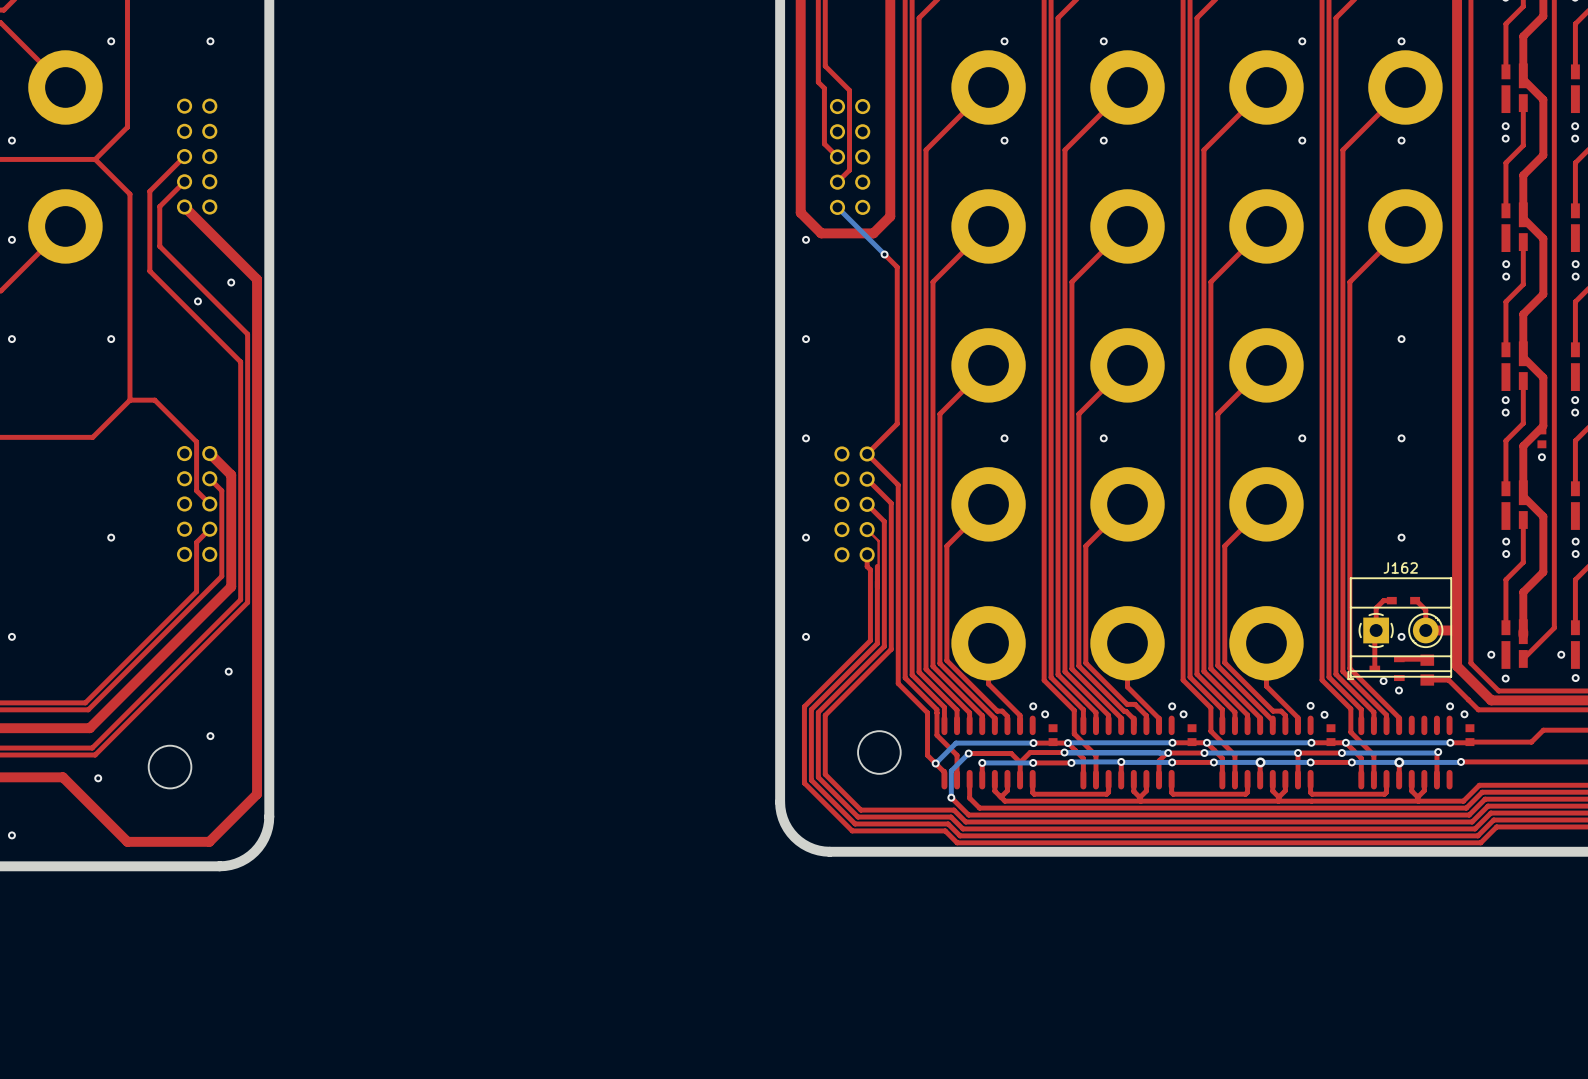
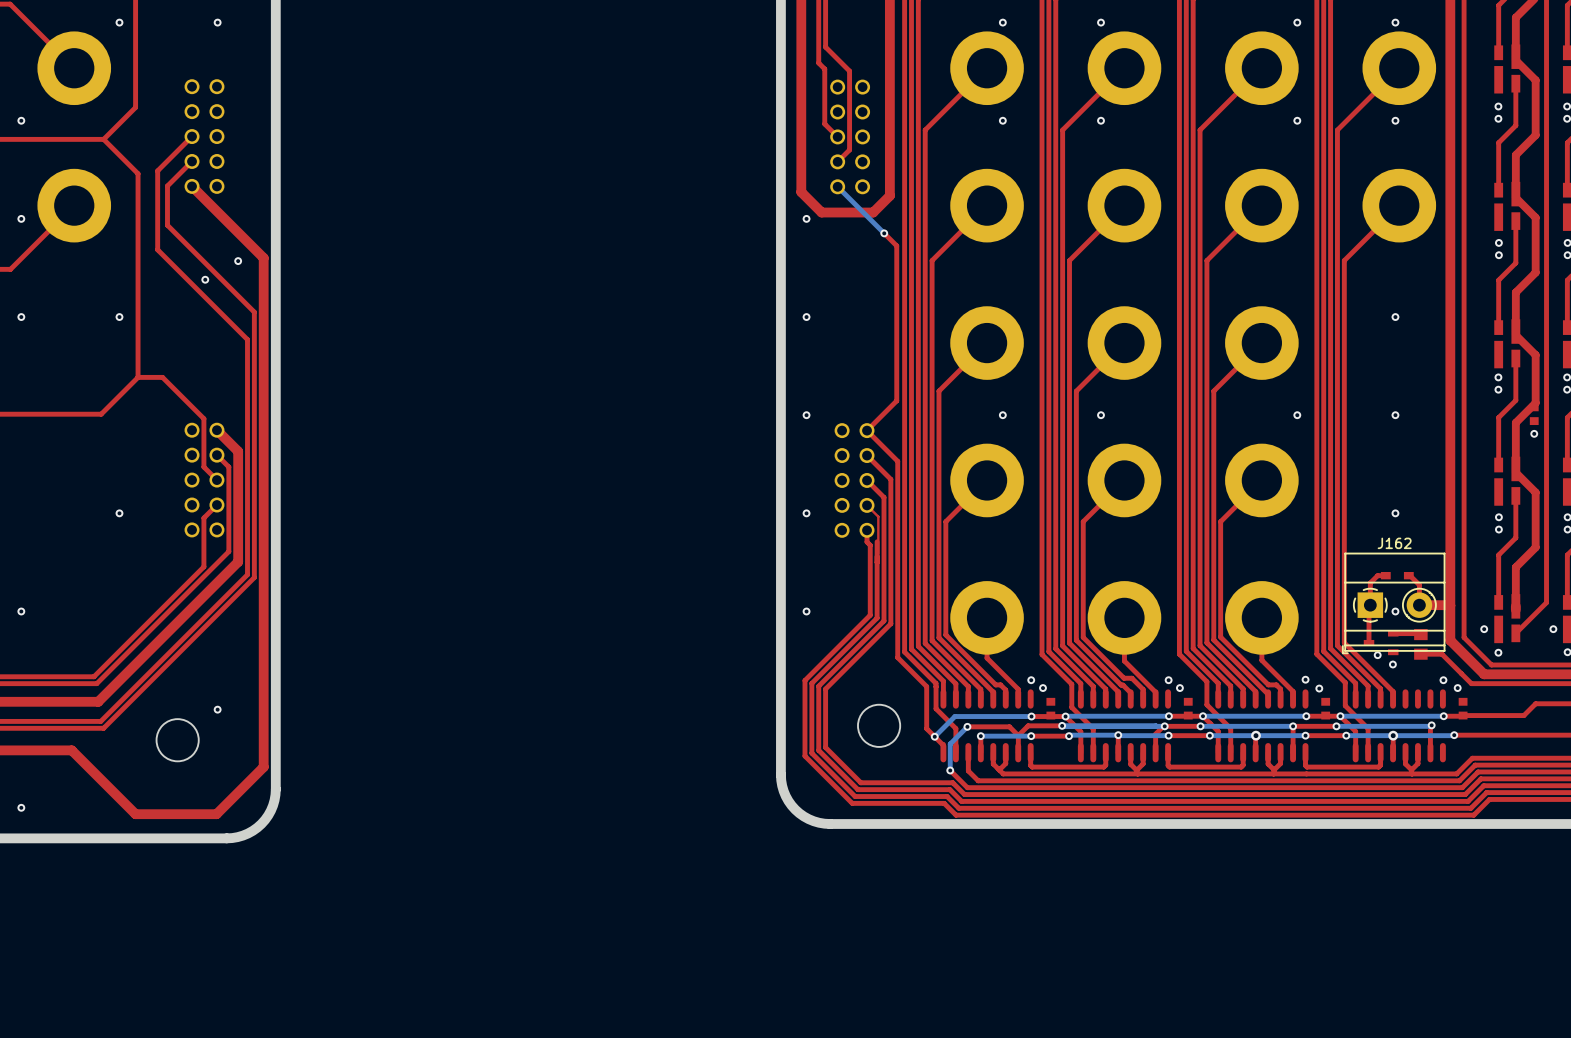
via: (228, 671) -> none
via: (98, 778) -> none

